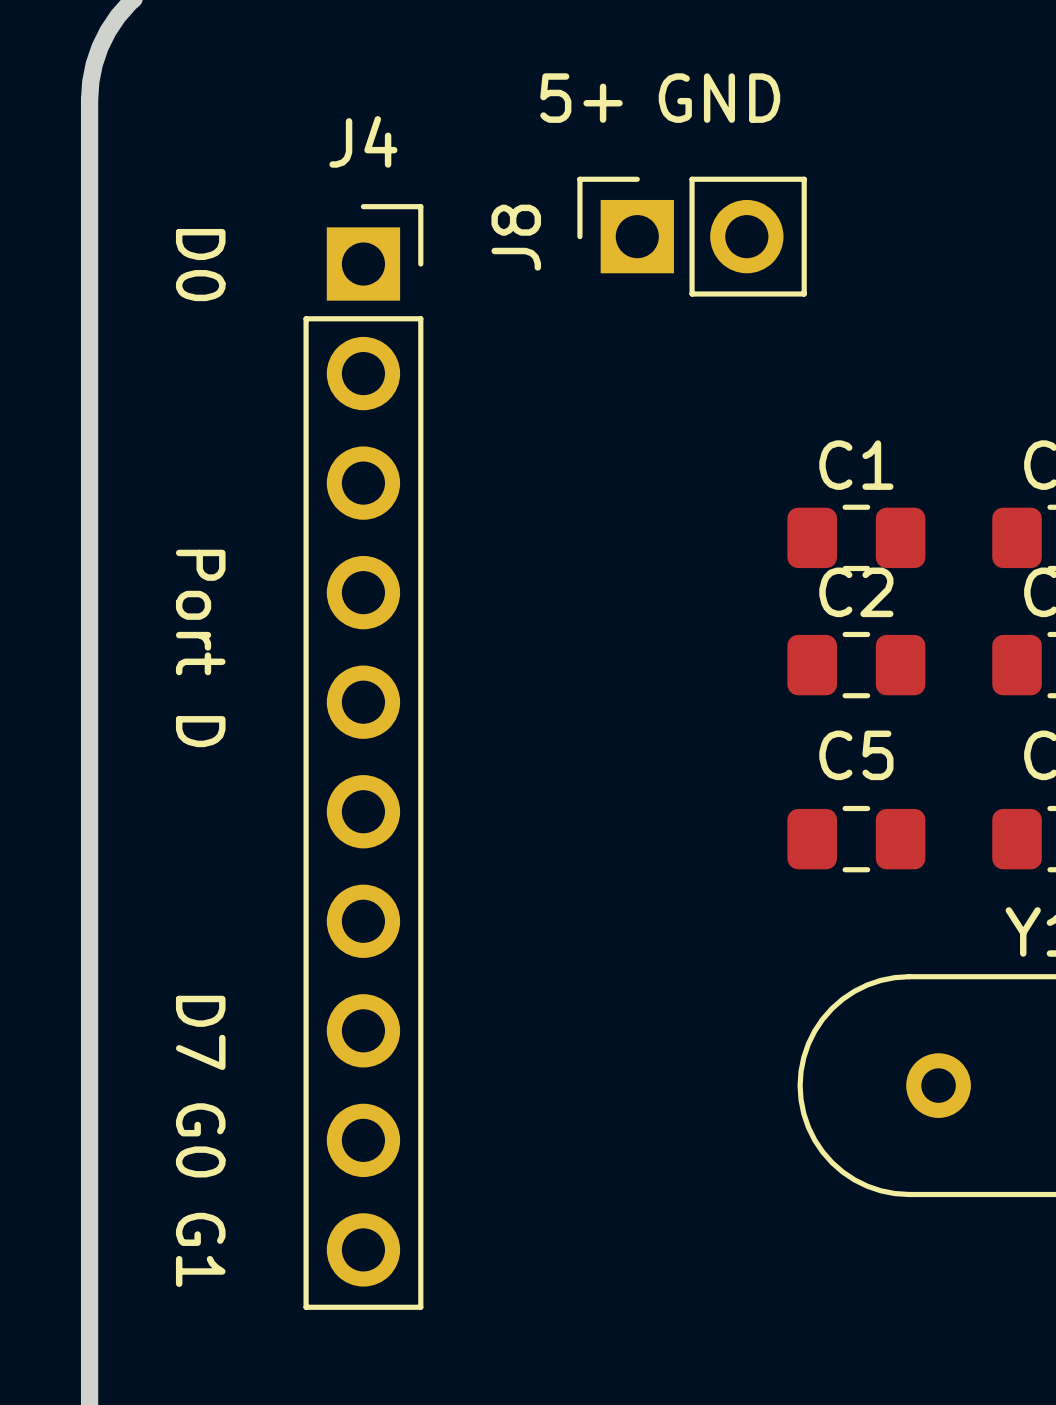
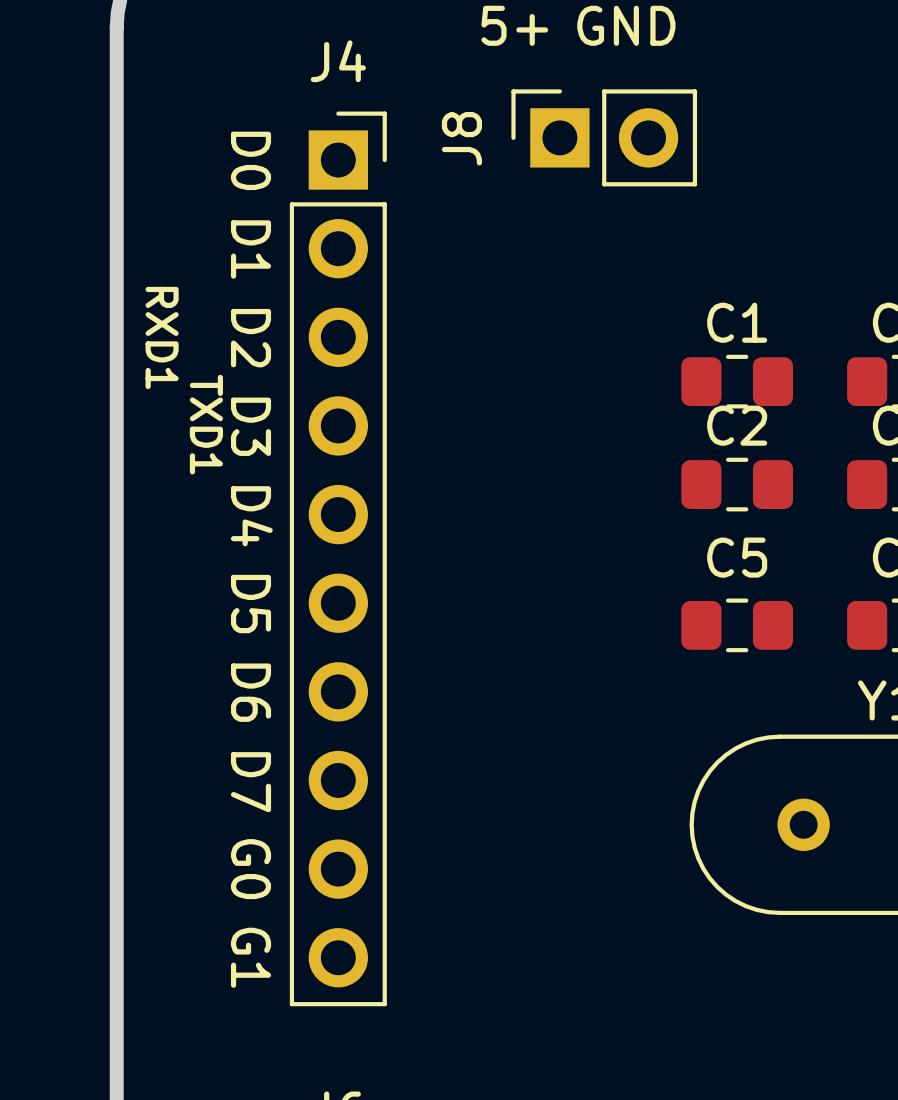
text position: D0 (200, 265) -> D0 (251, 160)
text: none -> D1 (251, 249)
text: none -> RXD1 (162, 337)
text: none -> D2 (251, 338)
text: none -> TXD1 (206, 424)
text: none -> D3 (251, 426)
text: Port D (200, 648) -> none
text: none -> D4 (251, 516)
text: none -> D5 (251, 604)
text: none -> D6 (251, 692)
text position: D7 (200, 1032) -> D7 (251, 782)
text position: G0 (200, 1140) -> G0 (251, 869)
text position: G1 (200, 1249) -> G1 (251, 957)

